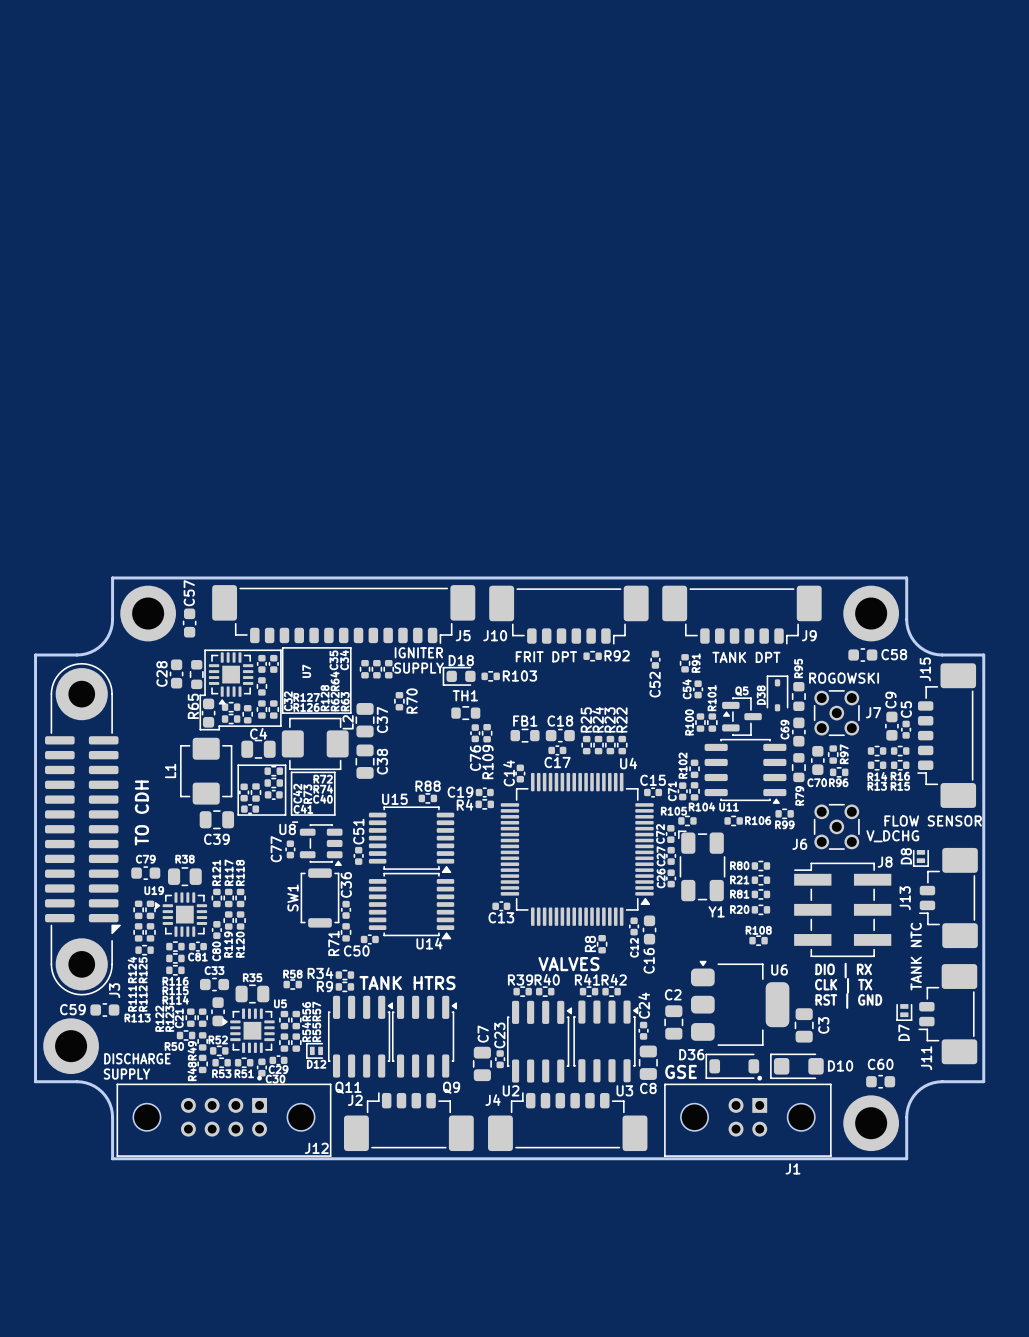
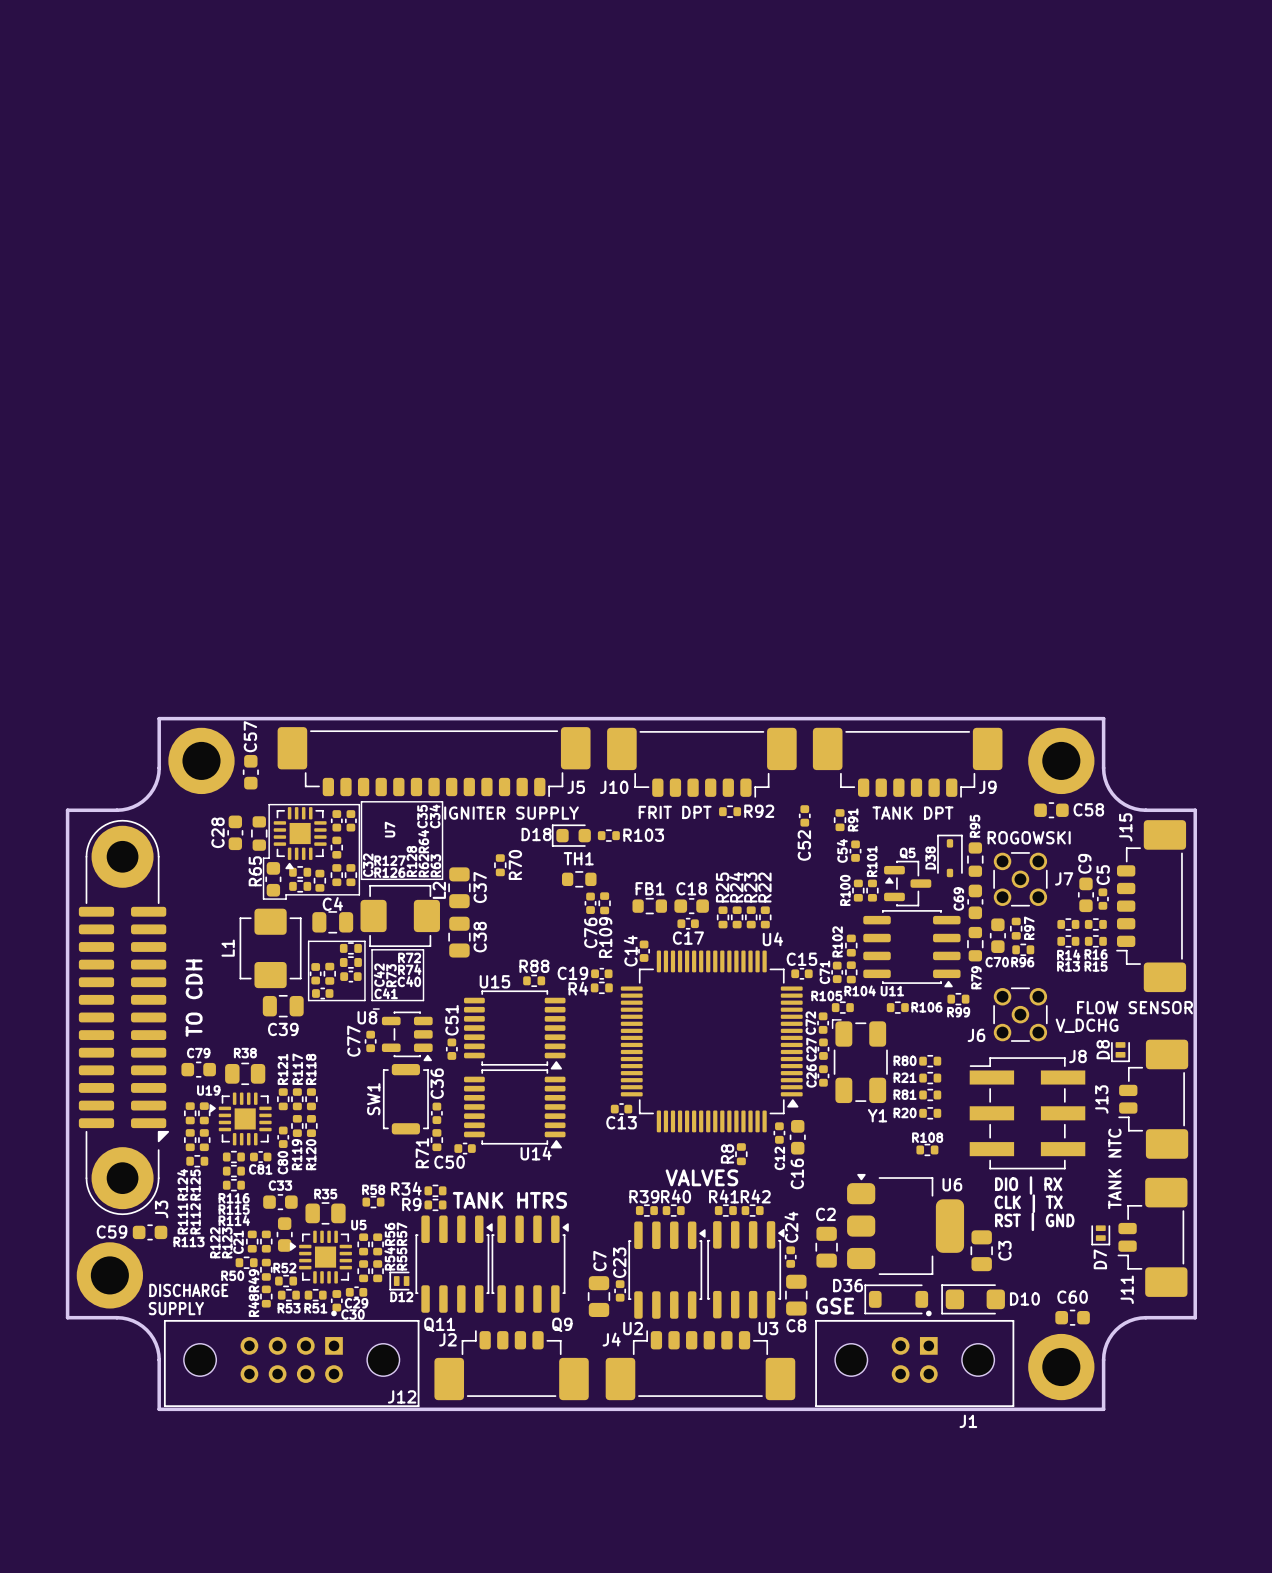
text: IGNITER (418, 652) -> IGNITER SUPPLY (511, 813)
D18 name position: D18 (461, 660) -> D18 (536, 834)
text: SUPPLY (419, 668) -> none
part: (365, 669) -> none
part: (376, 669) -> none
part: (388, 669) -> none

